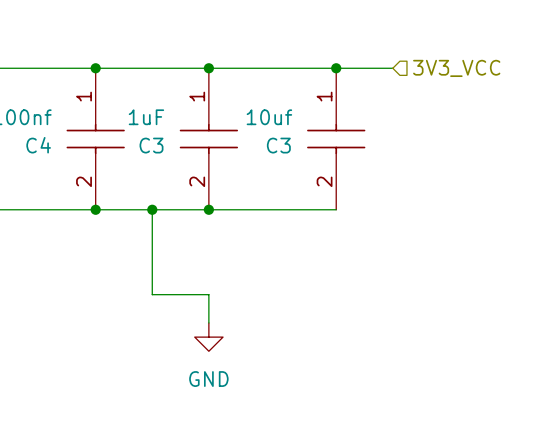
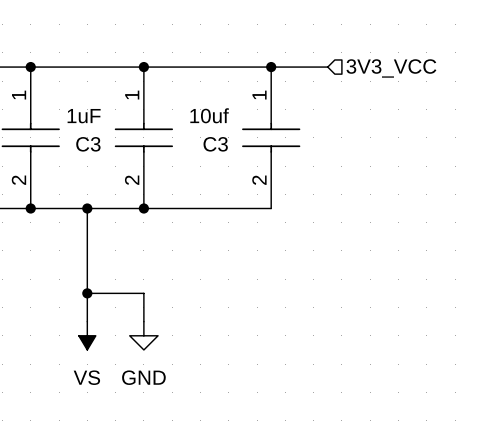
wire: none -> (87, 293) (87, 321)
junction: none -> (87, 293)
power symbol: none -> VS (87, 335)

